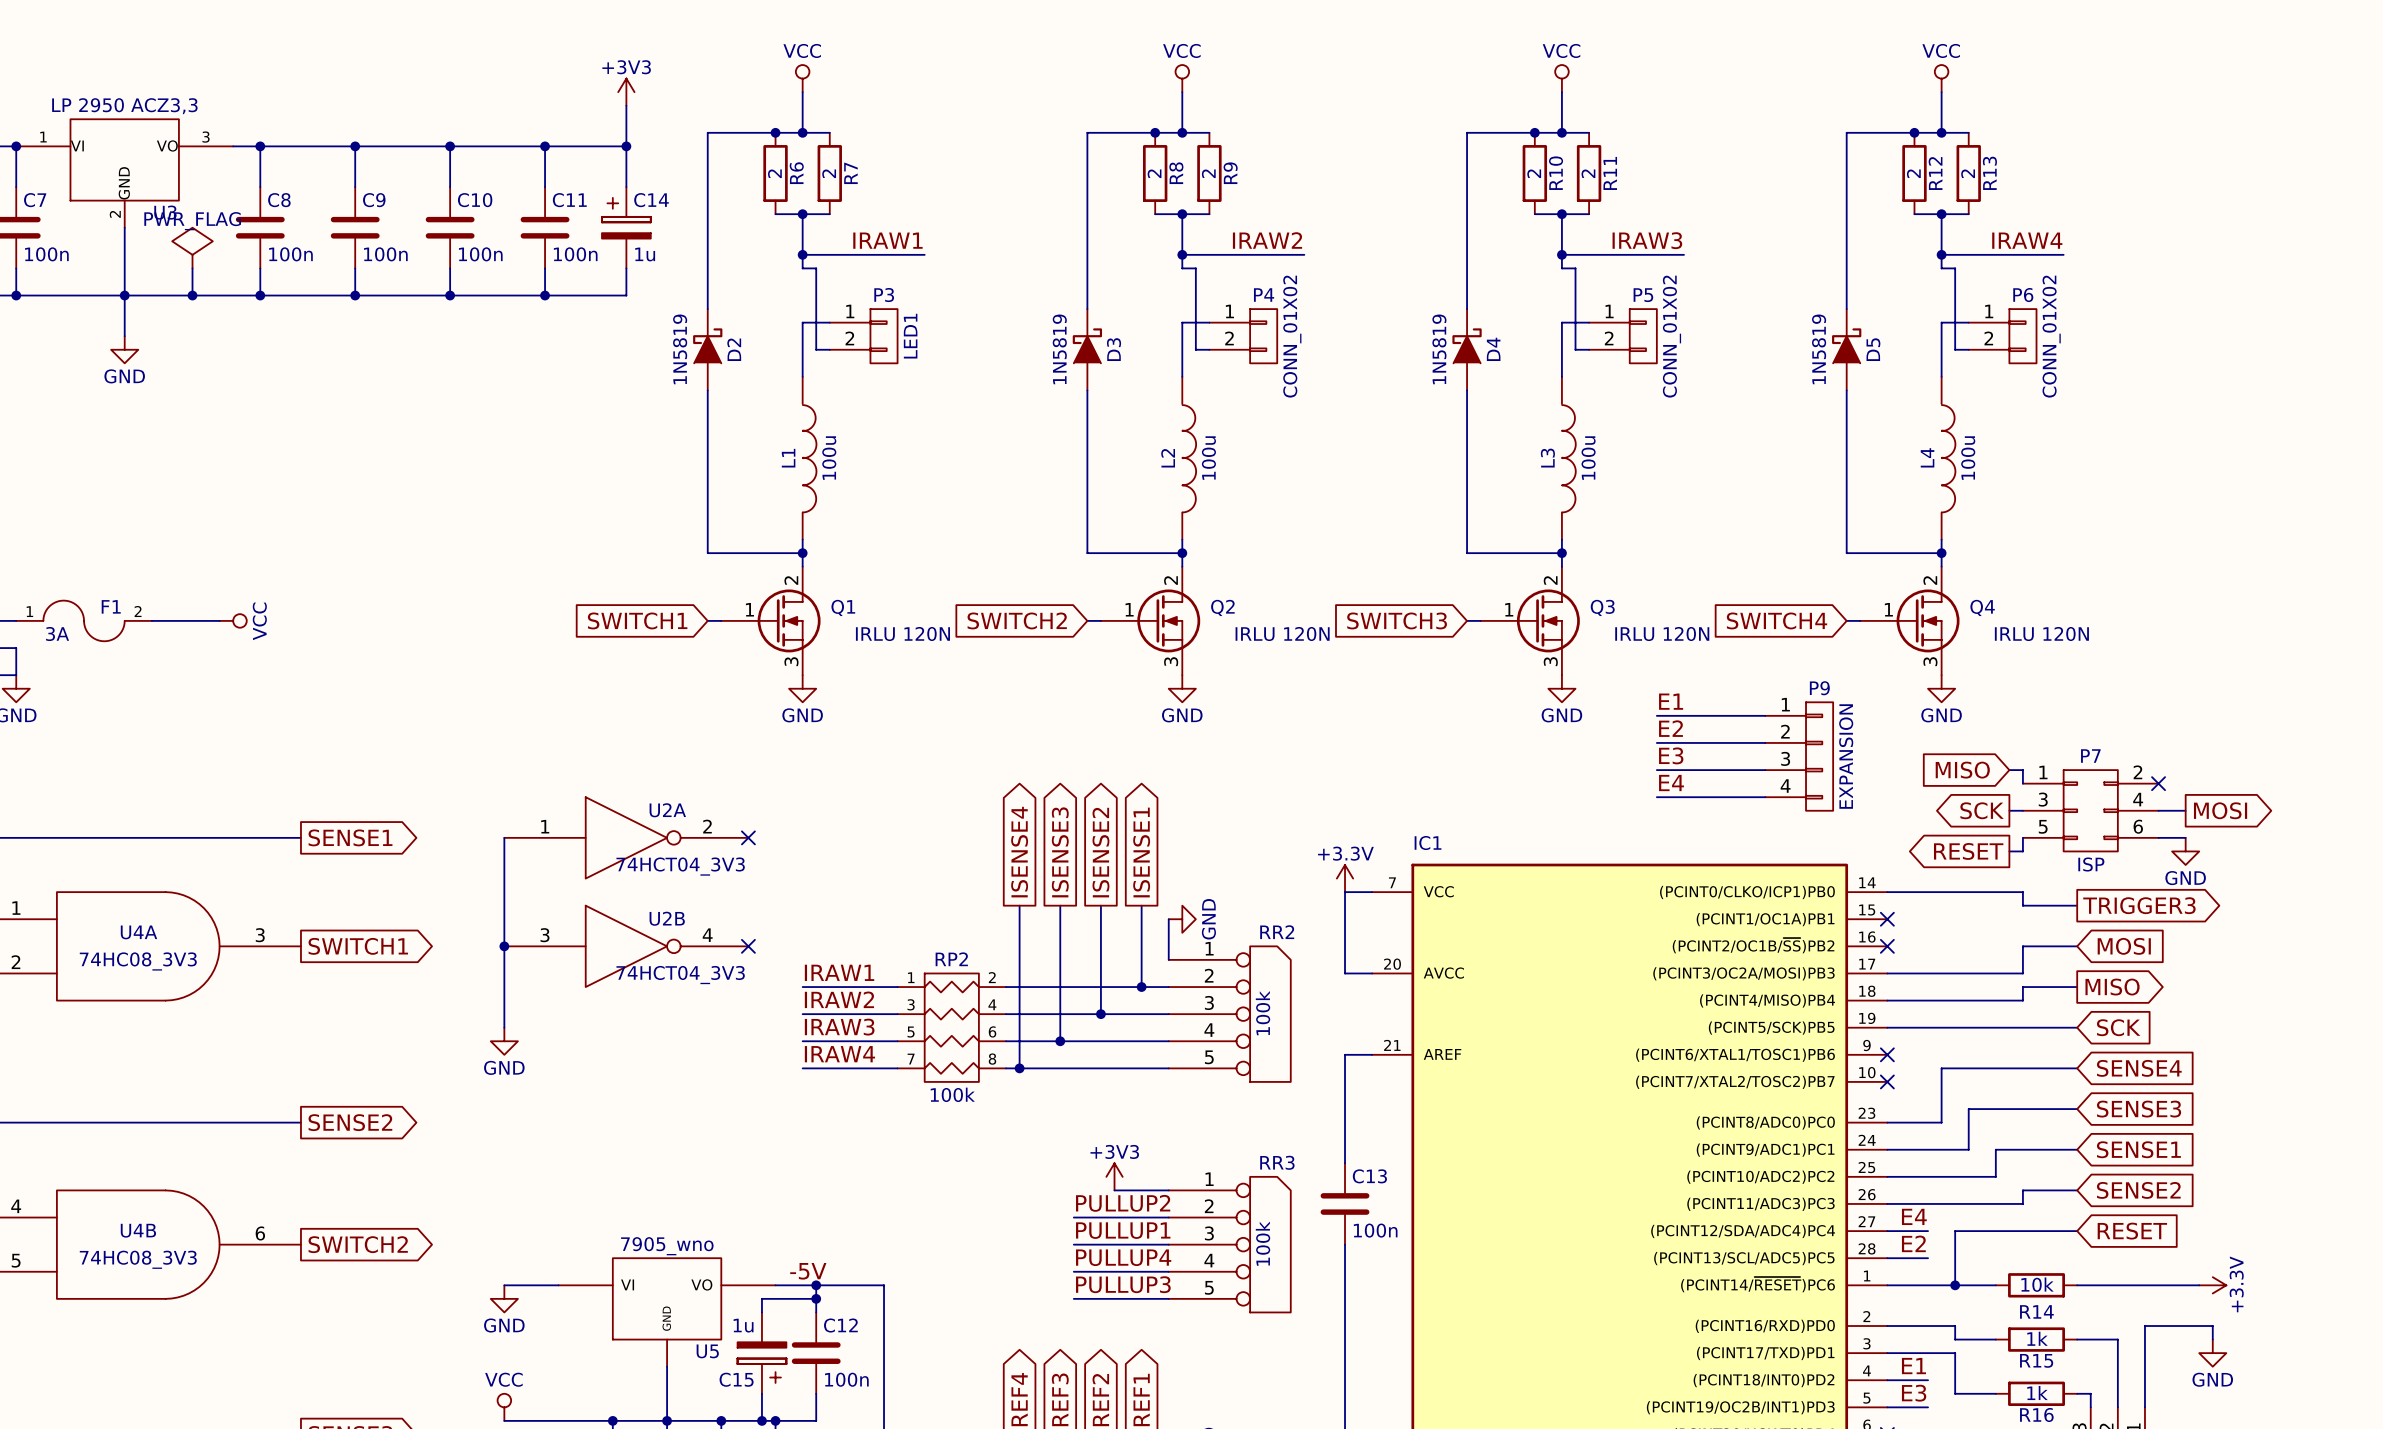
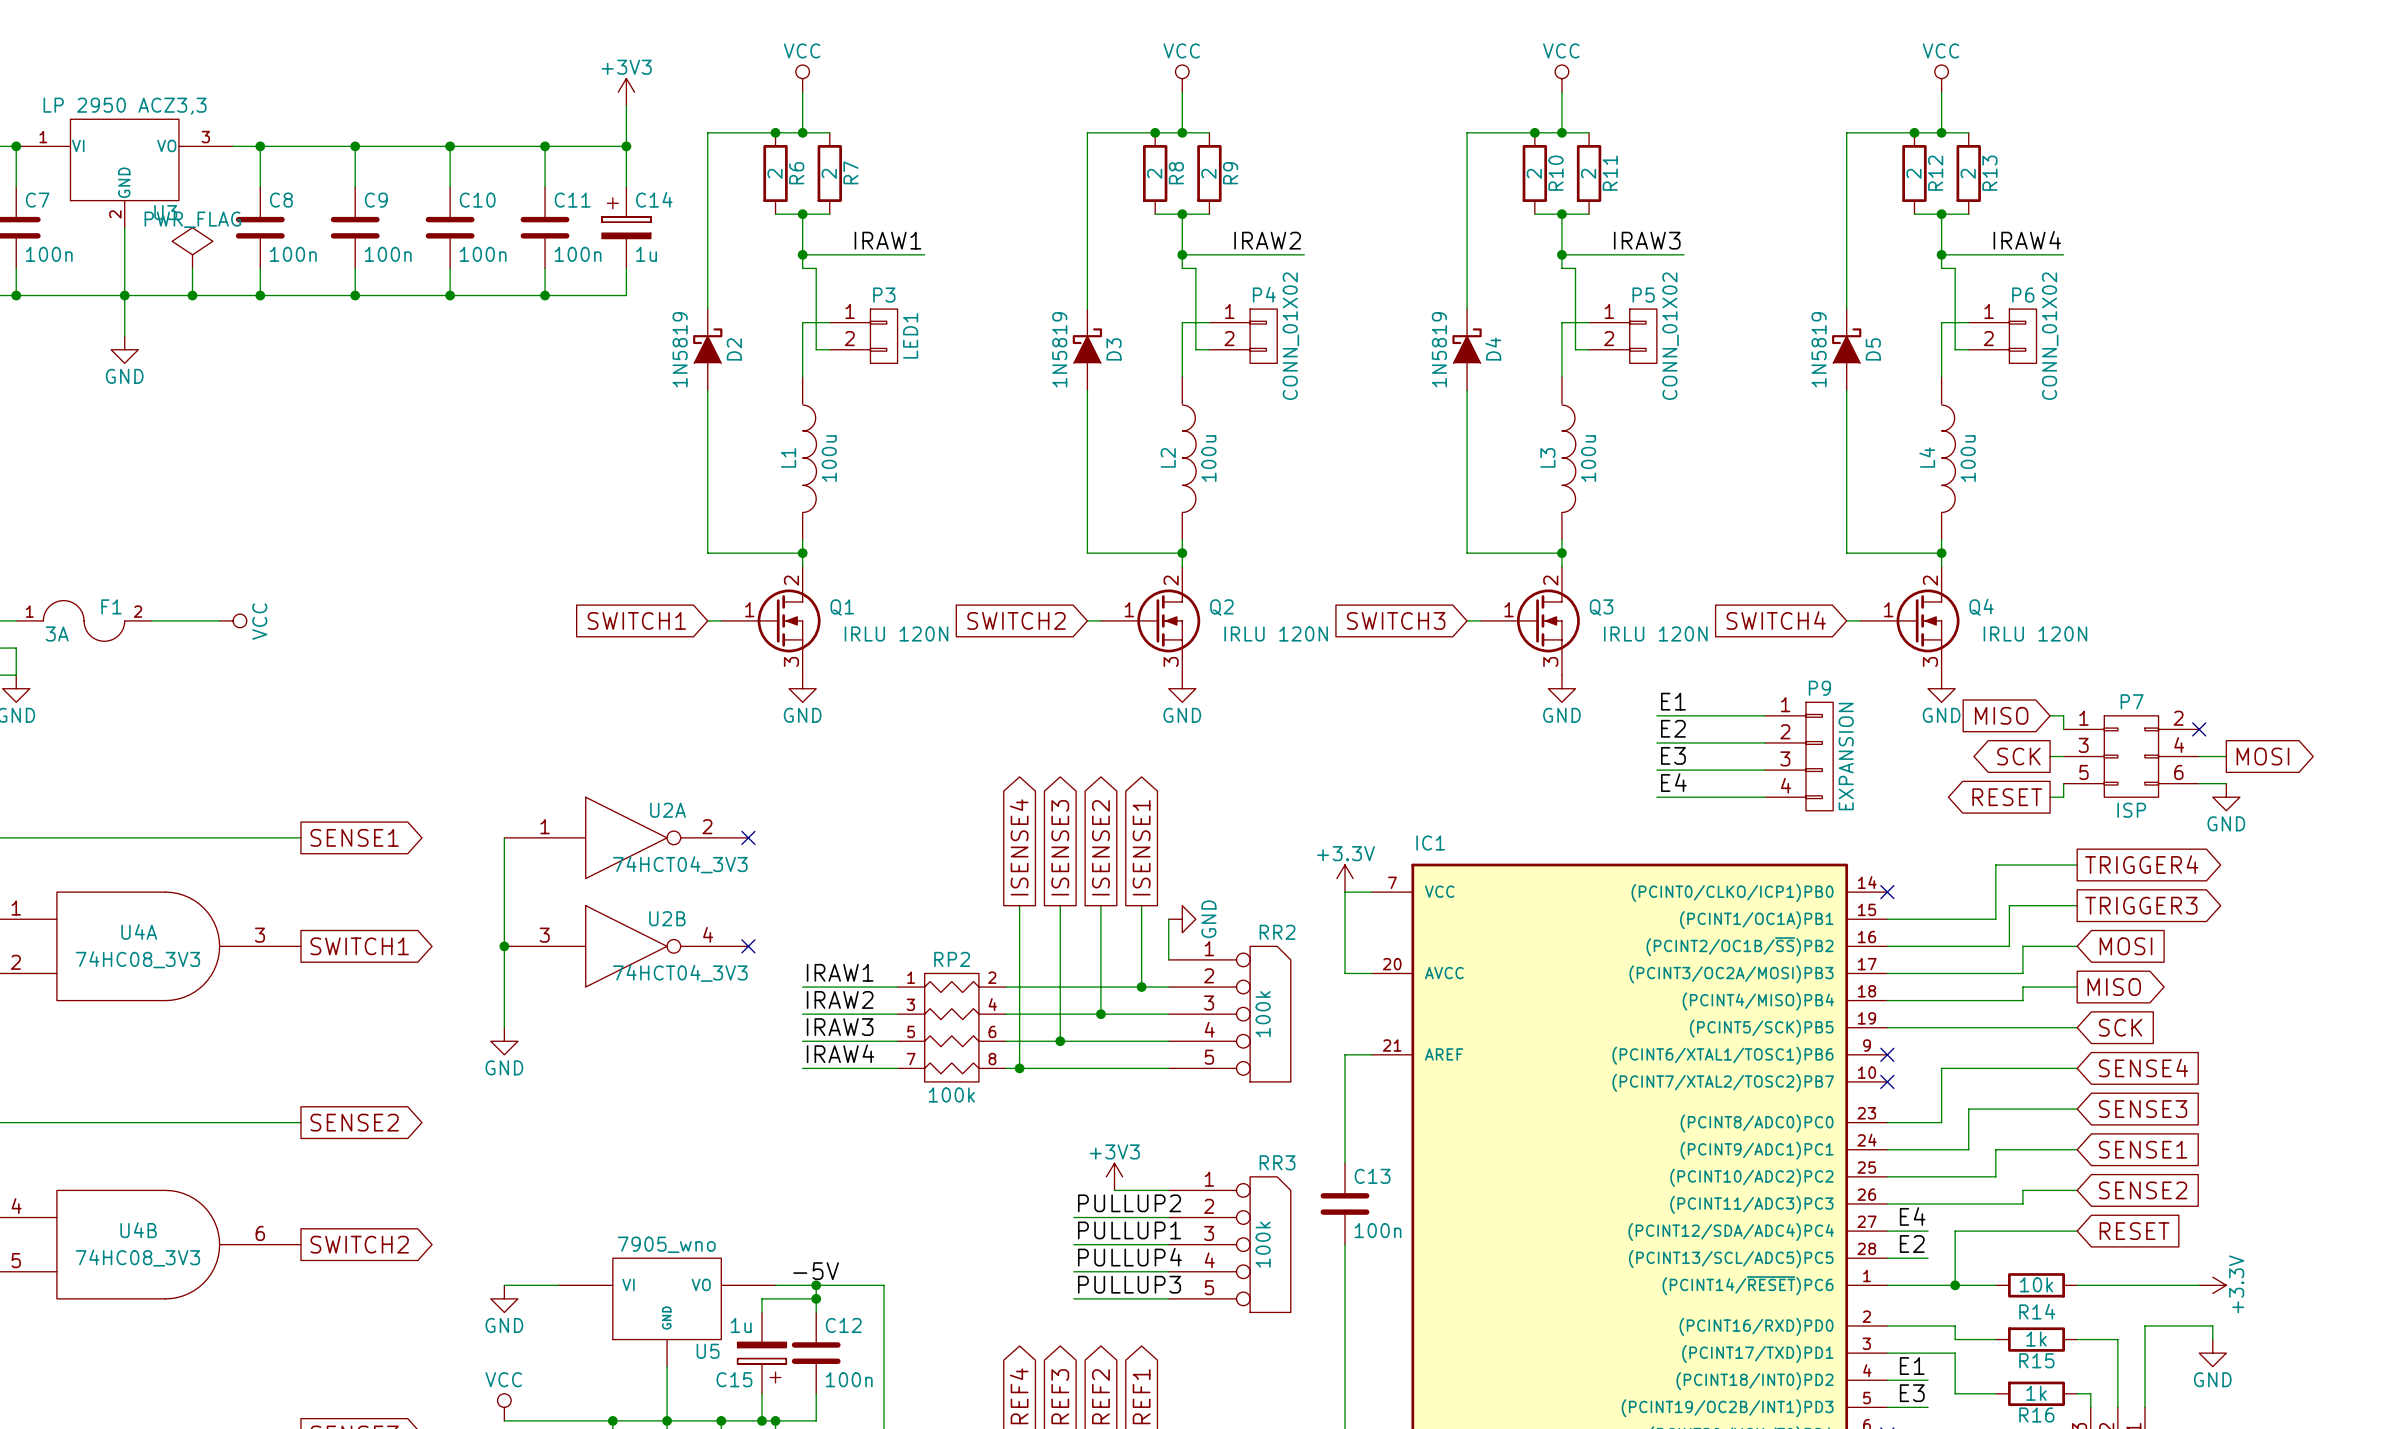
no-connect mark: none -> (2199, 729)
global label position: MISO (1962, 770) -> MISO (2001, 715)
wire: (2009, 770) (2022, 770) (2022, 783) -> (2050, 715) (2063, 715) (2063, 729)
no-connect mark: (2158, 783) -> none
global label position: SCK (1982, 810) -> SCK (2018, 756)
wire: (2009, 810) (2022, 810) -> (2050, 756) (2063, 756)
P7 position: (2090, 810) -> (2131, 756)
wire: (2158, 810) (2185, 810) -> (2199, 756) (2226, 756)
global label position: MOSI (2220, 810) -> MOSI (2262, 756)
wire: (2022, 837) (2022, 851) (2009, 851) -> (2063, 783) (2063, 797) (2050, 797)
wire: (2158, 837) (2185, 837) -> (2199, 783) (2226, 783)
global label position: RESET (1968, 851) -> RESET (2007, 797)
power symbol position: GND (2185, 851) -> GND (2226, 797)
wire: none -> (2077, 865) (1995, 865) (1995, 919) (1887, 919)
global label: none -> TRIGGER4 (2141, 864)
wire: (1887, 892) (2022, 892) (2022, 905) -> (1887, 946) (2009, 946) (2009, 905) (2022, 905)
no-connect mark: none -> (1887, 892)
no-connect mark: (1887, 919) -> none
no-connect mark: (1887, 946) -> none

